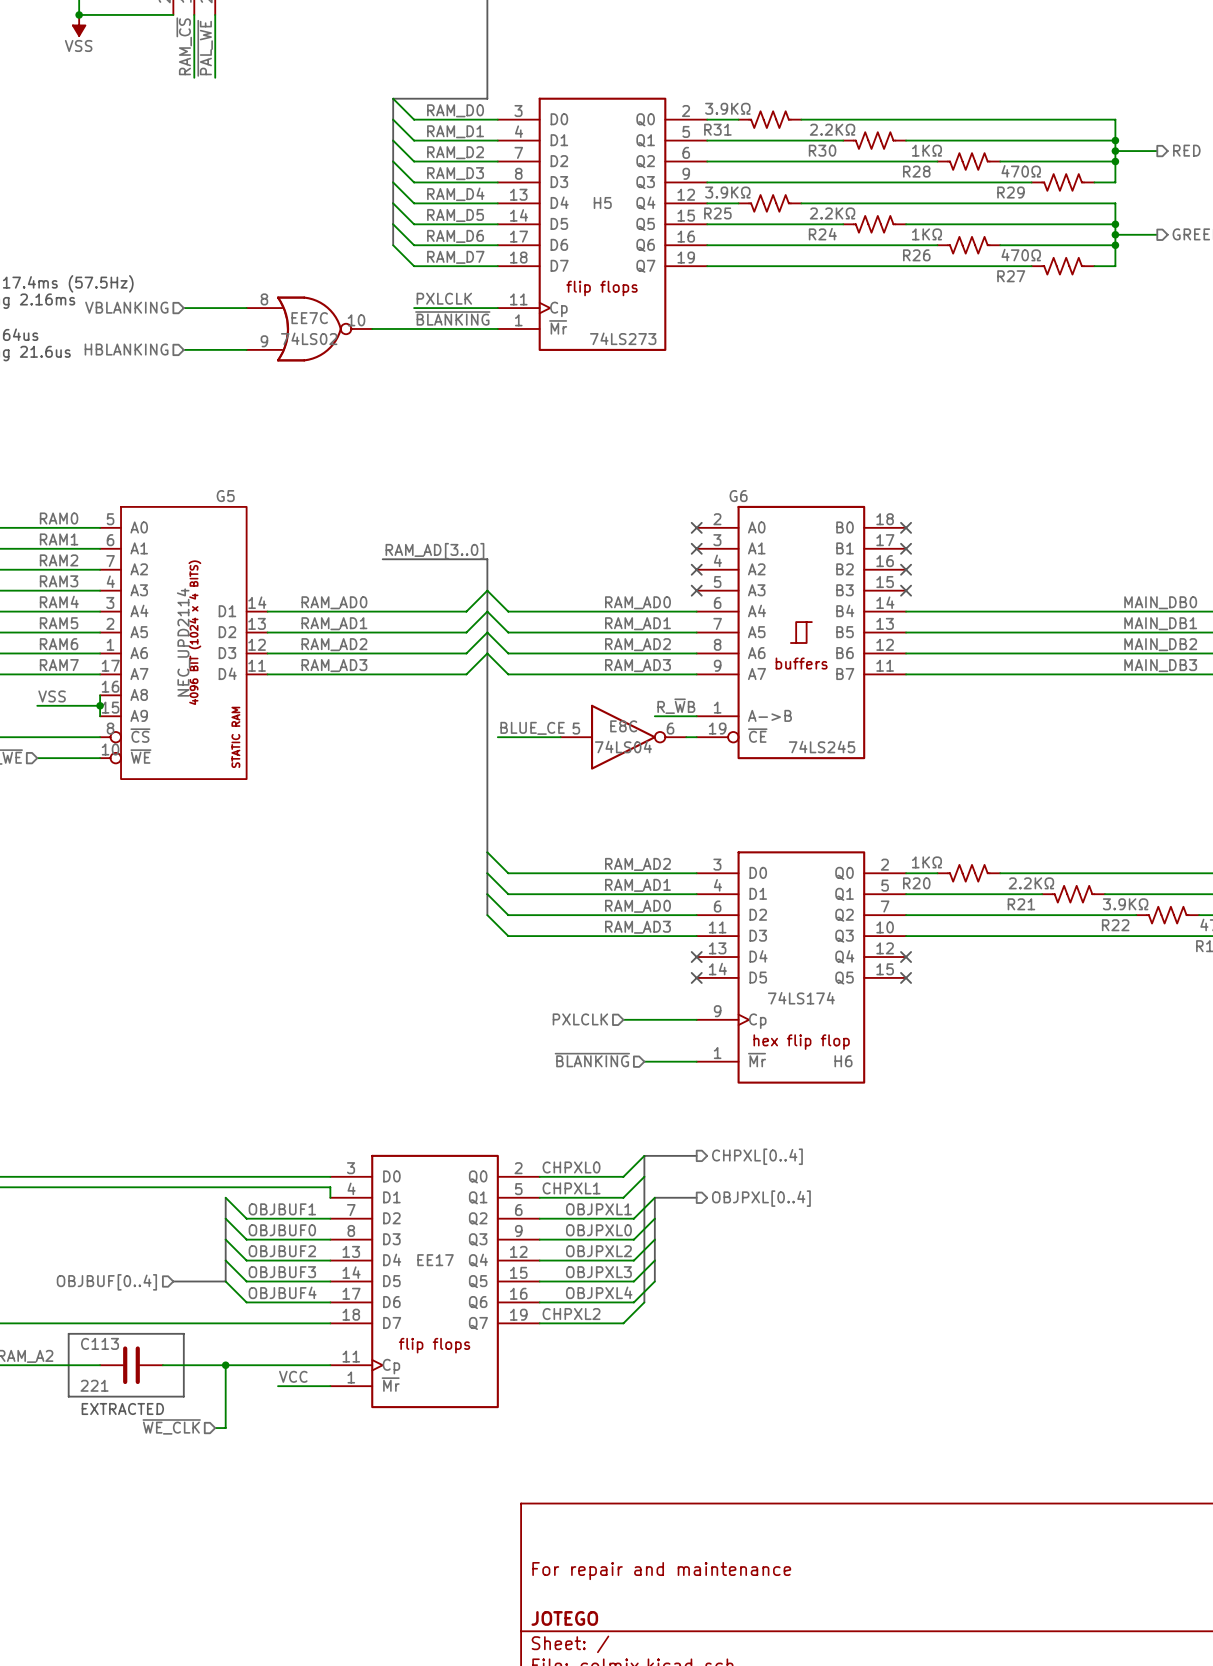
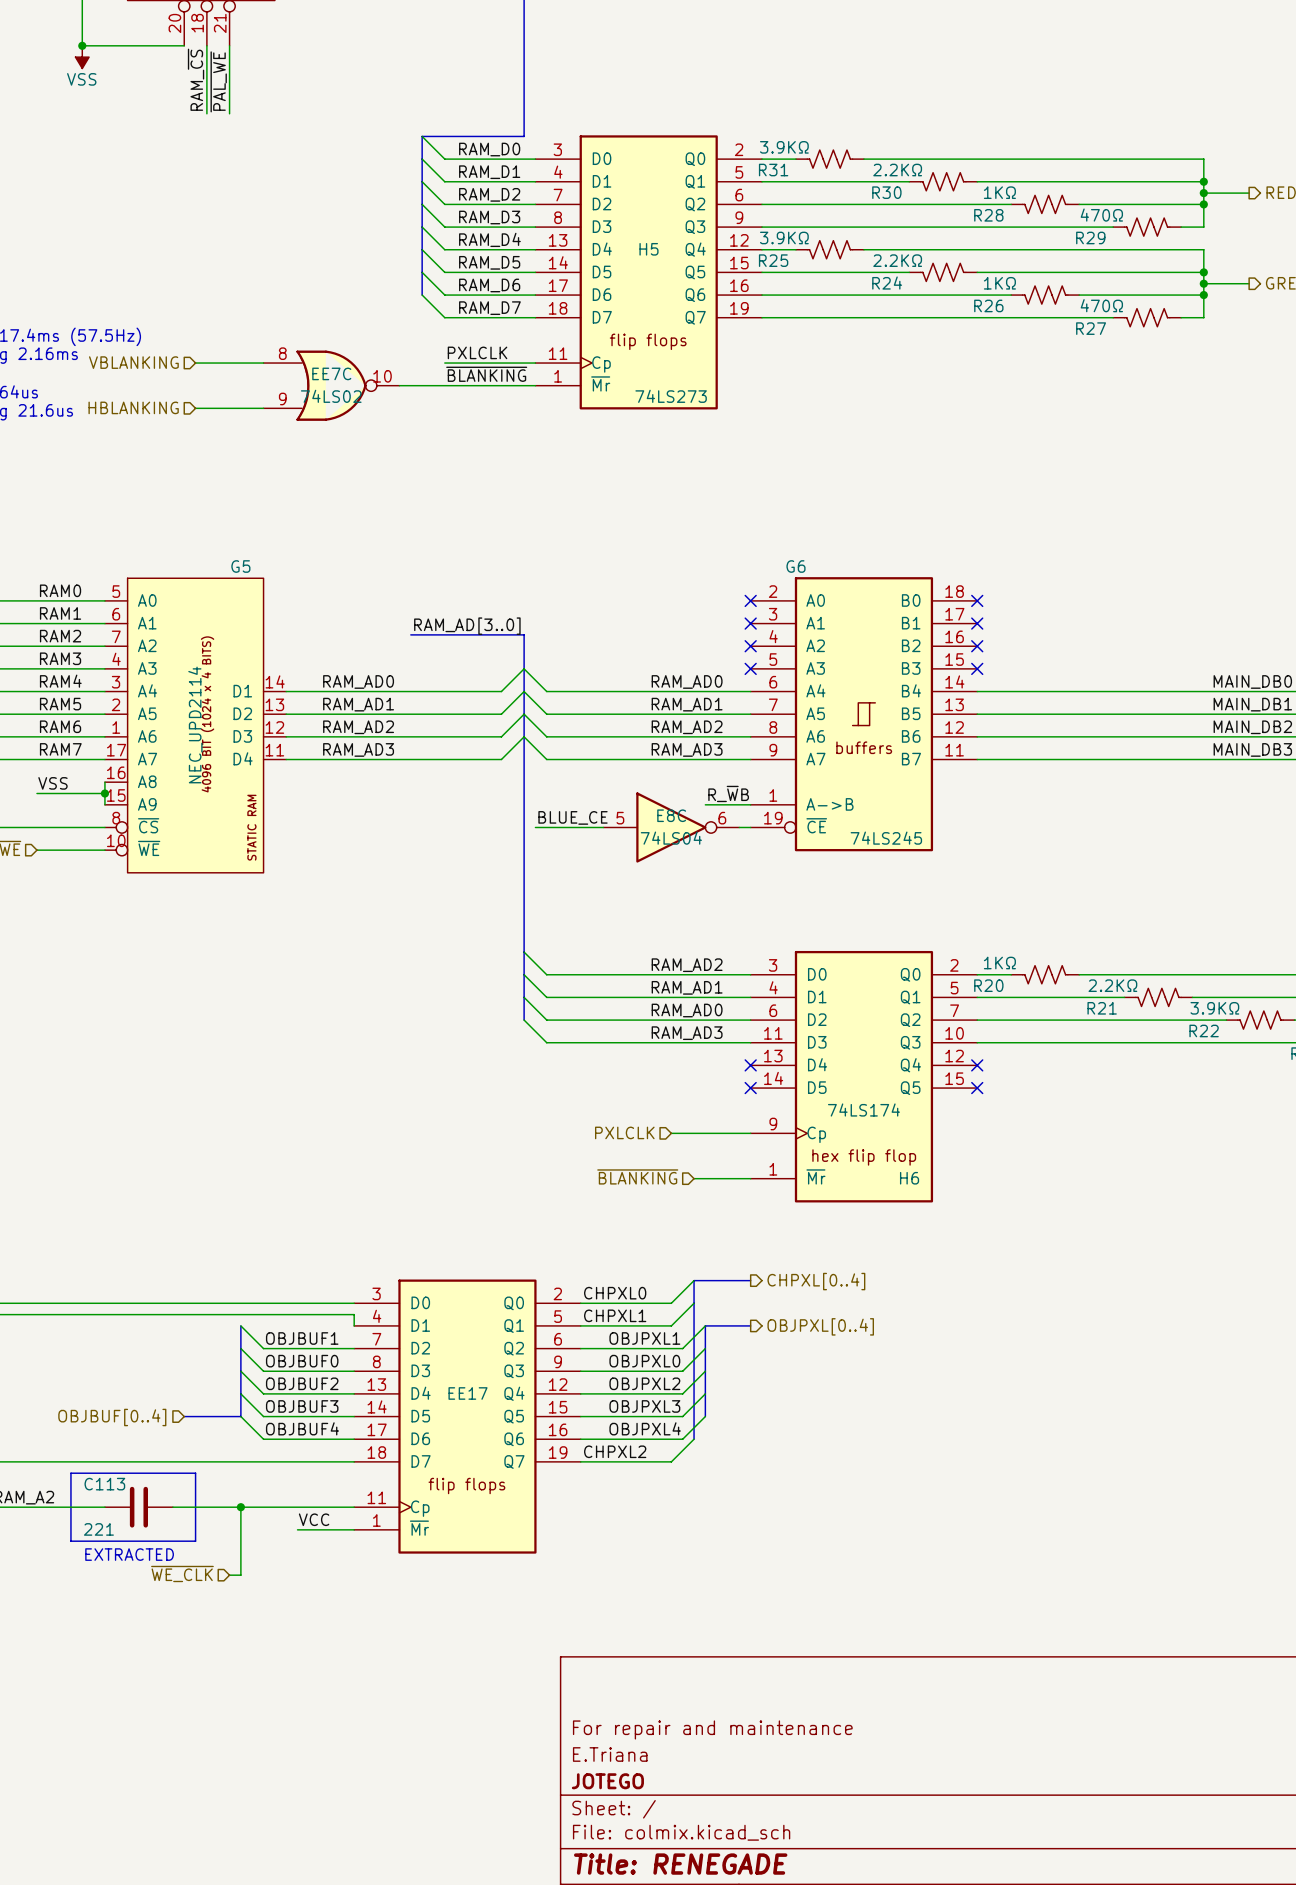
title block: none -> E.Triana (610, 1754)

